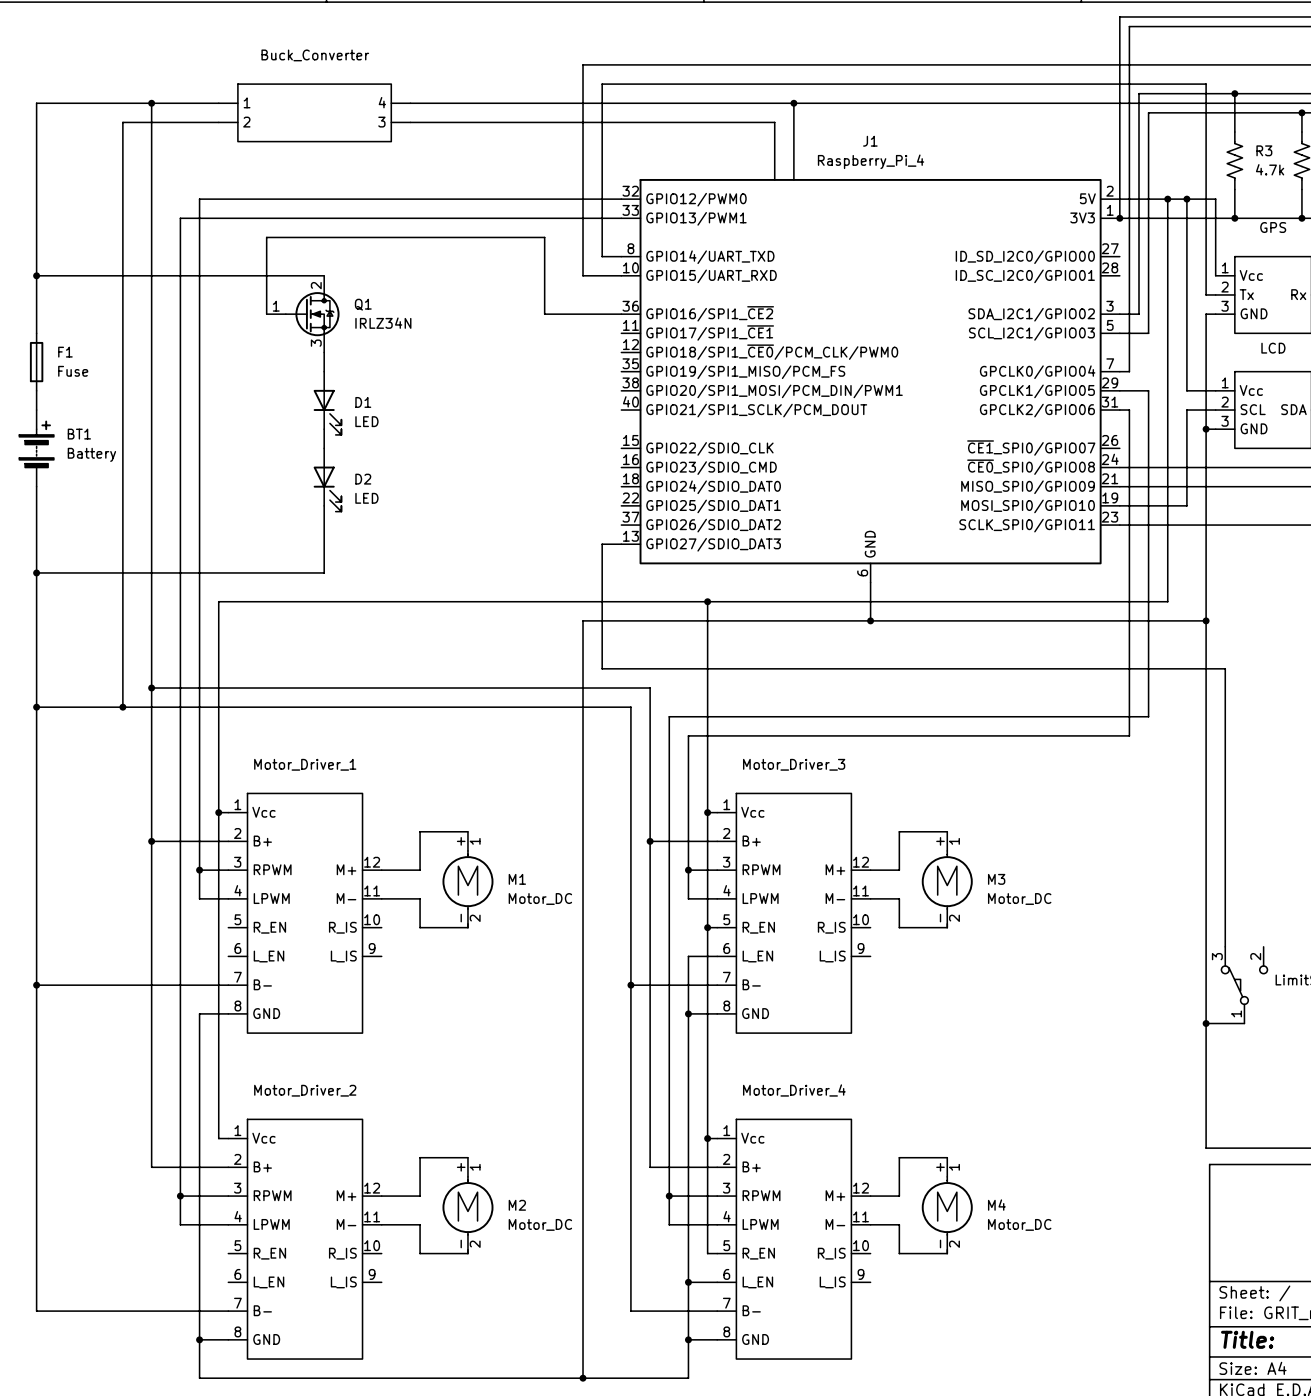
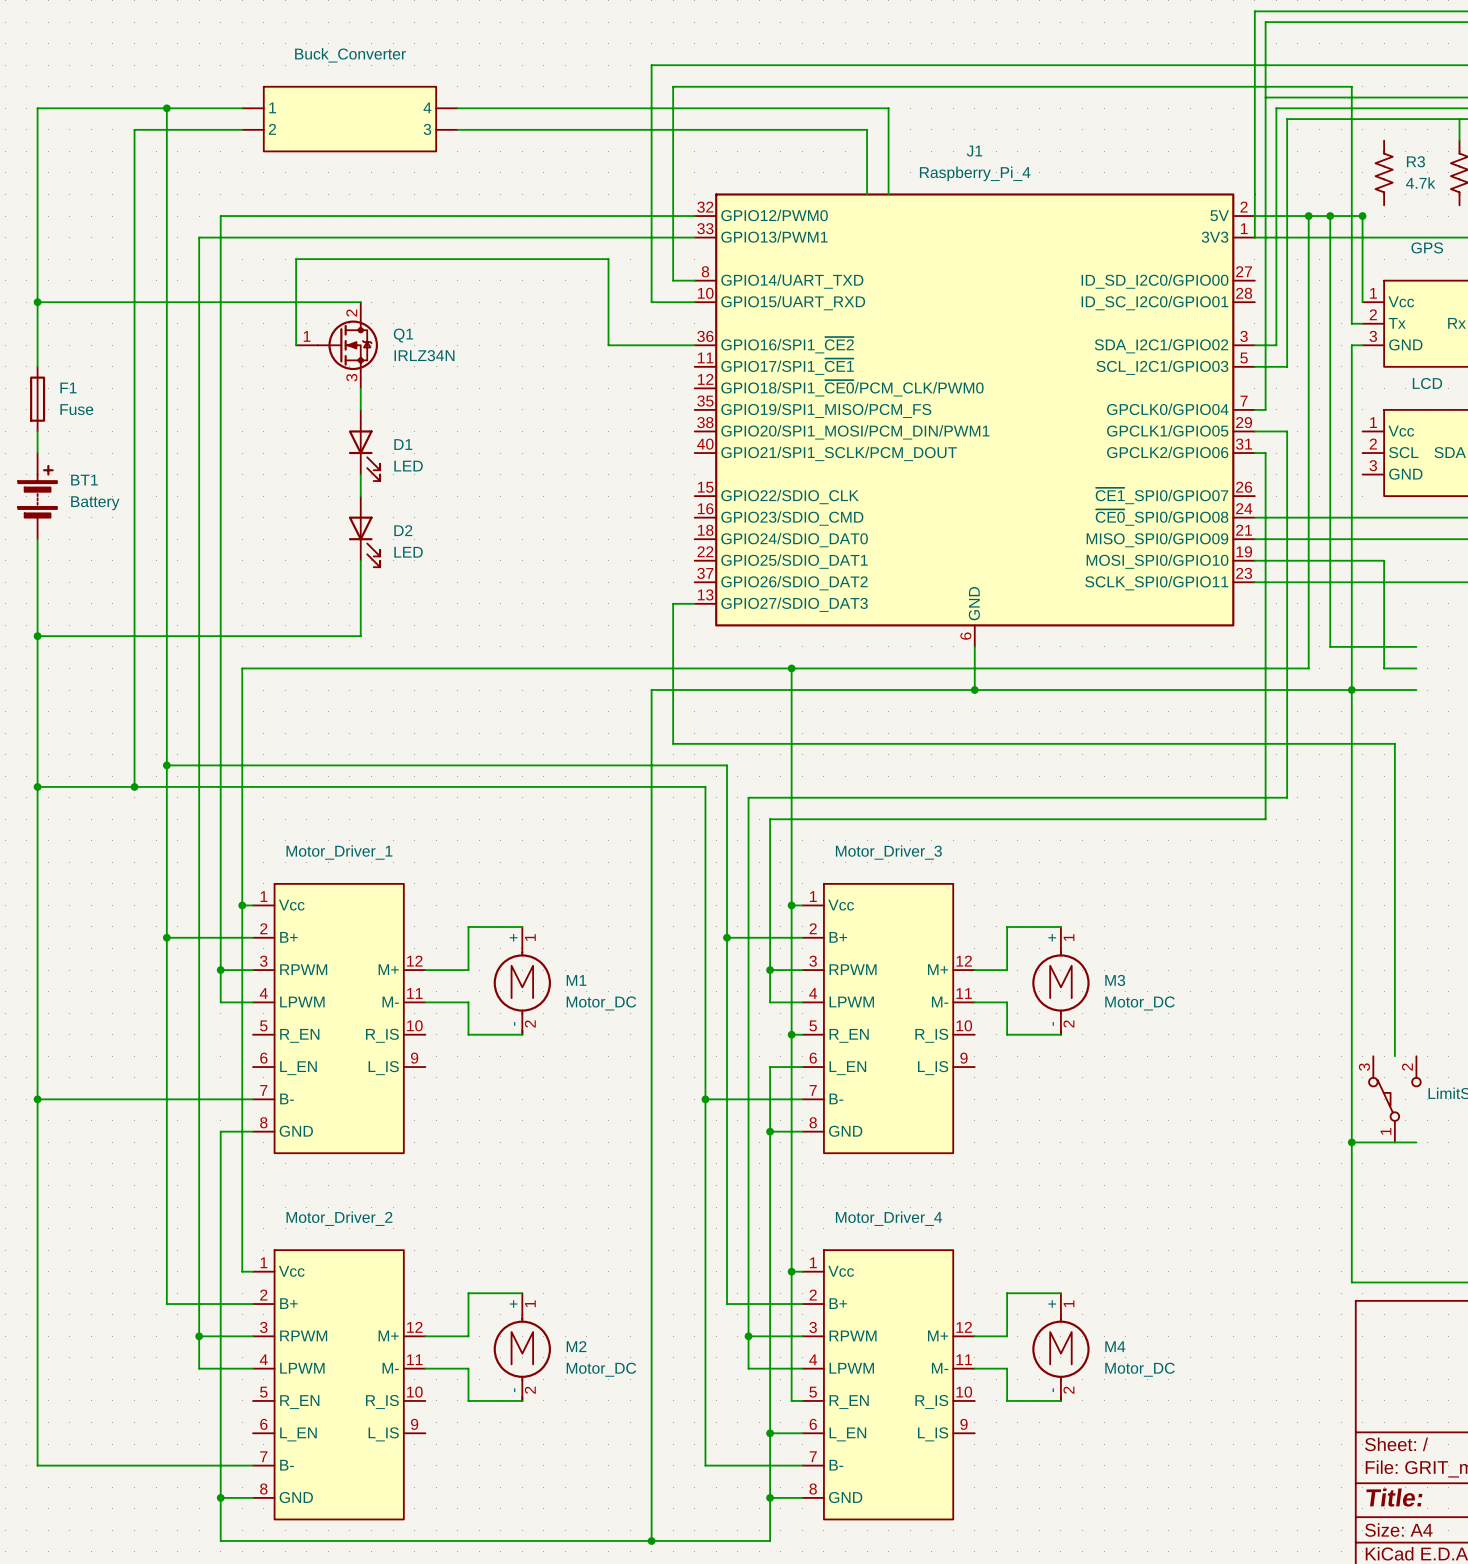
wire: (1138, 93) (1138, 103) (793, 103) -> (1276, 97) (1265, 97)
wire: (1234, 93) (1234, 132) -> none
junction: (1234, 93) -> none
junction: (793, 103) -> none
junction: (1301, 112) -> none
wire: (1234, 189) (1234, 218) -> none
wire: (1301, 189) (1301, 218) -> none
junction: (1119, 218) -> none
junction position: (1234, 218) -> (1362, 216)
junction: (1301, 218) -> none
wire: (1186, 390) (1215, 390) -> (1330, 431) (1330, 453)
wire: (1186, 410) (1215, 410) -> none
wire: (1206, 429) (1215, 429) -> none
junction: (1206, 429) -> none
wire: none -> (1416, 646) (1330, 646) (1330, 560) (1384, 560) (1384, 668) (1416, 668)
wire: none -> (1351, 690) (1416, 690)
wire: (1225, 668) (1225, 946) -> (1373, 743) (1394, 743) (1394, 1056)
wire: none -> (1394, 1142) (1416, 1142)

